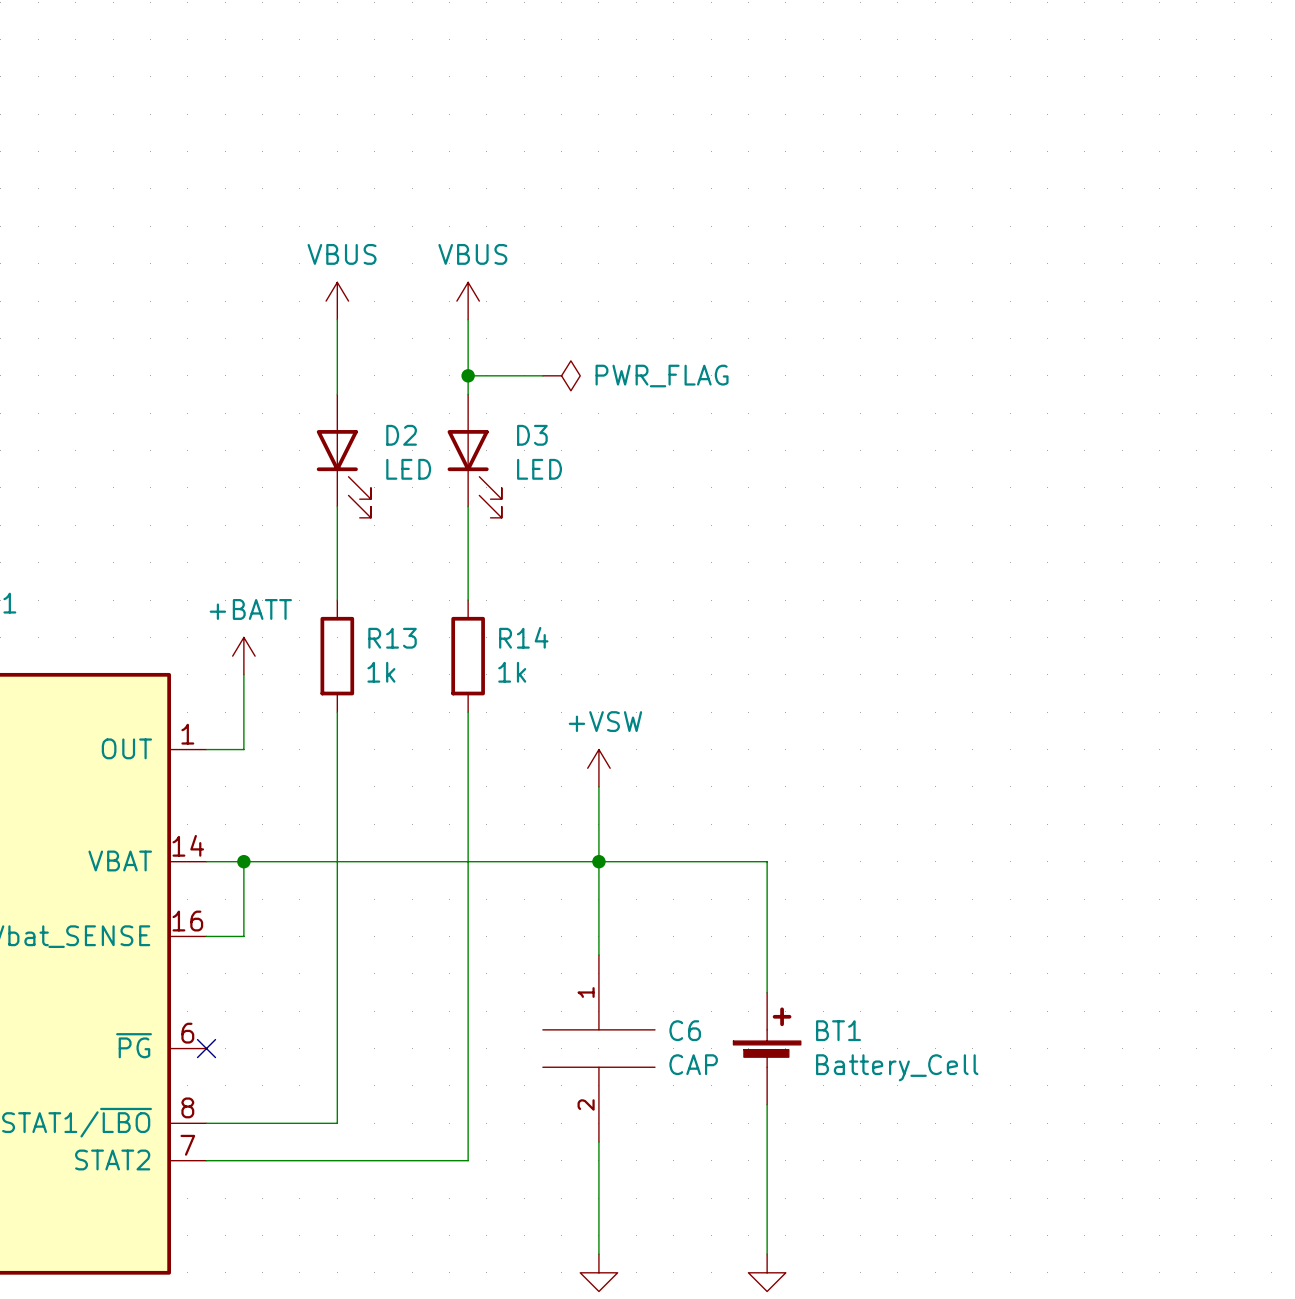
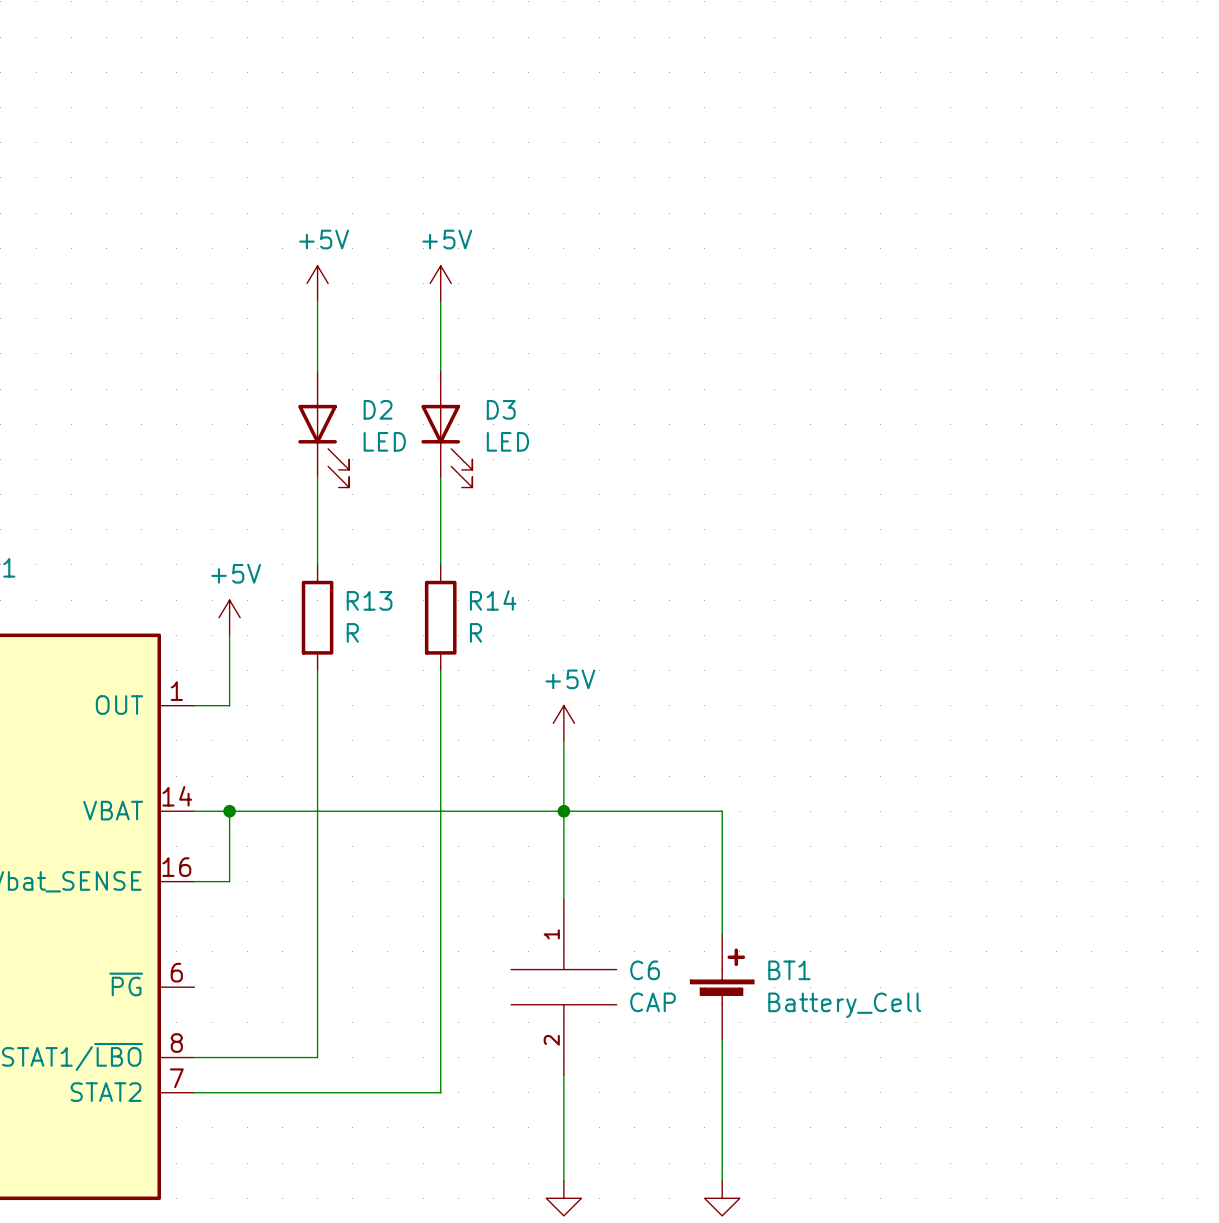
power symbol: VBUS (337, 301) -> +5V (317, 283)
power symbol: VBUS (468, 301) -> +5V (440, 283)
wire: (468, 375) (542, 375) -> none
junction: (468, 375) -> none
power symbol: PWR_FLAG (561, 375) -> none
power symbol: +BATT (243, 656) -> +5V (229, 617)
R13 value: 1k (381, 672) -> R (352, 632)
R14 value: 1k (512, 672) -> R (475, 632)
power symbol: +VSW (598, 768) -> +5V (563, 723)
no-connect mark: (206, 1048) -> none

